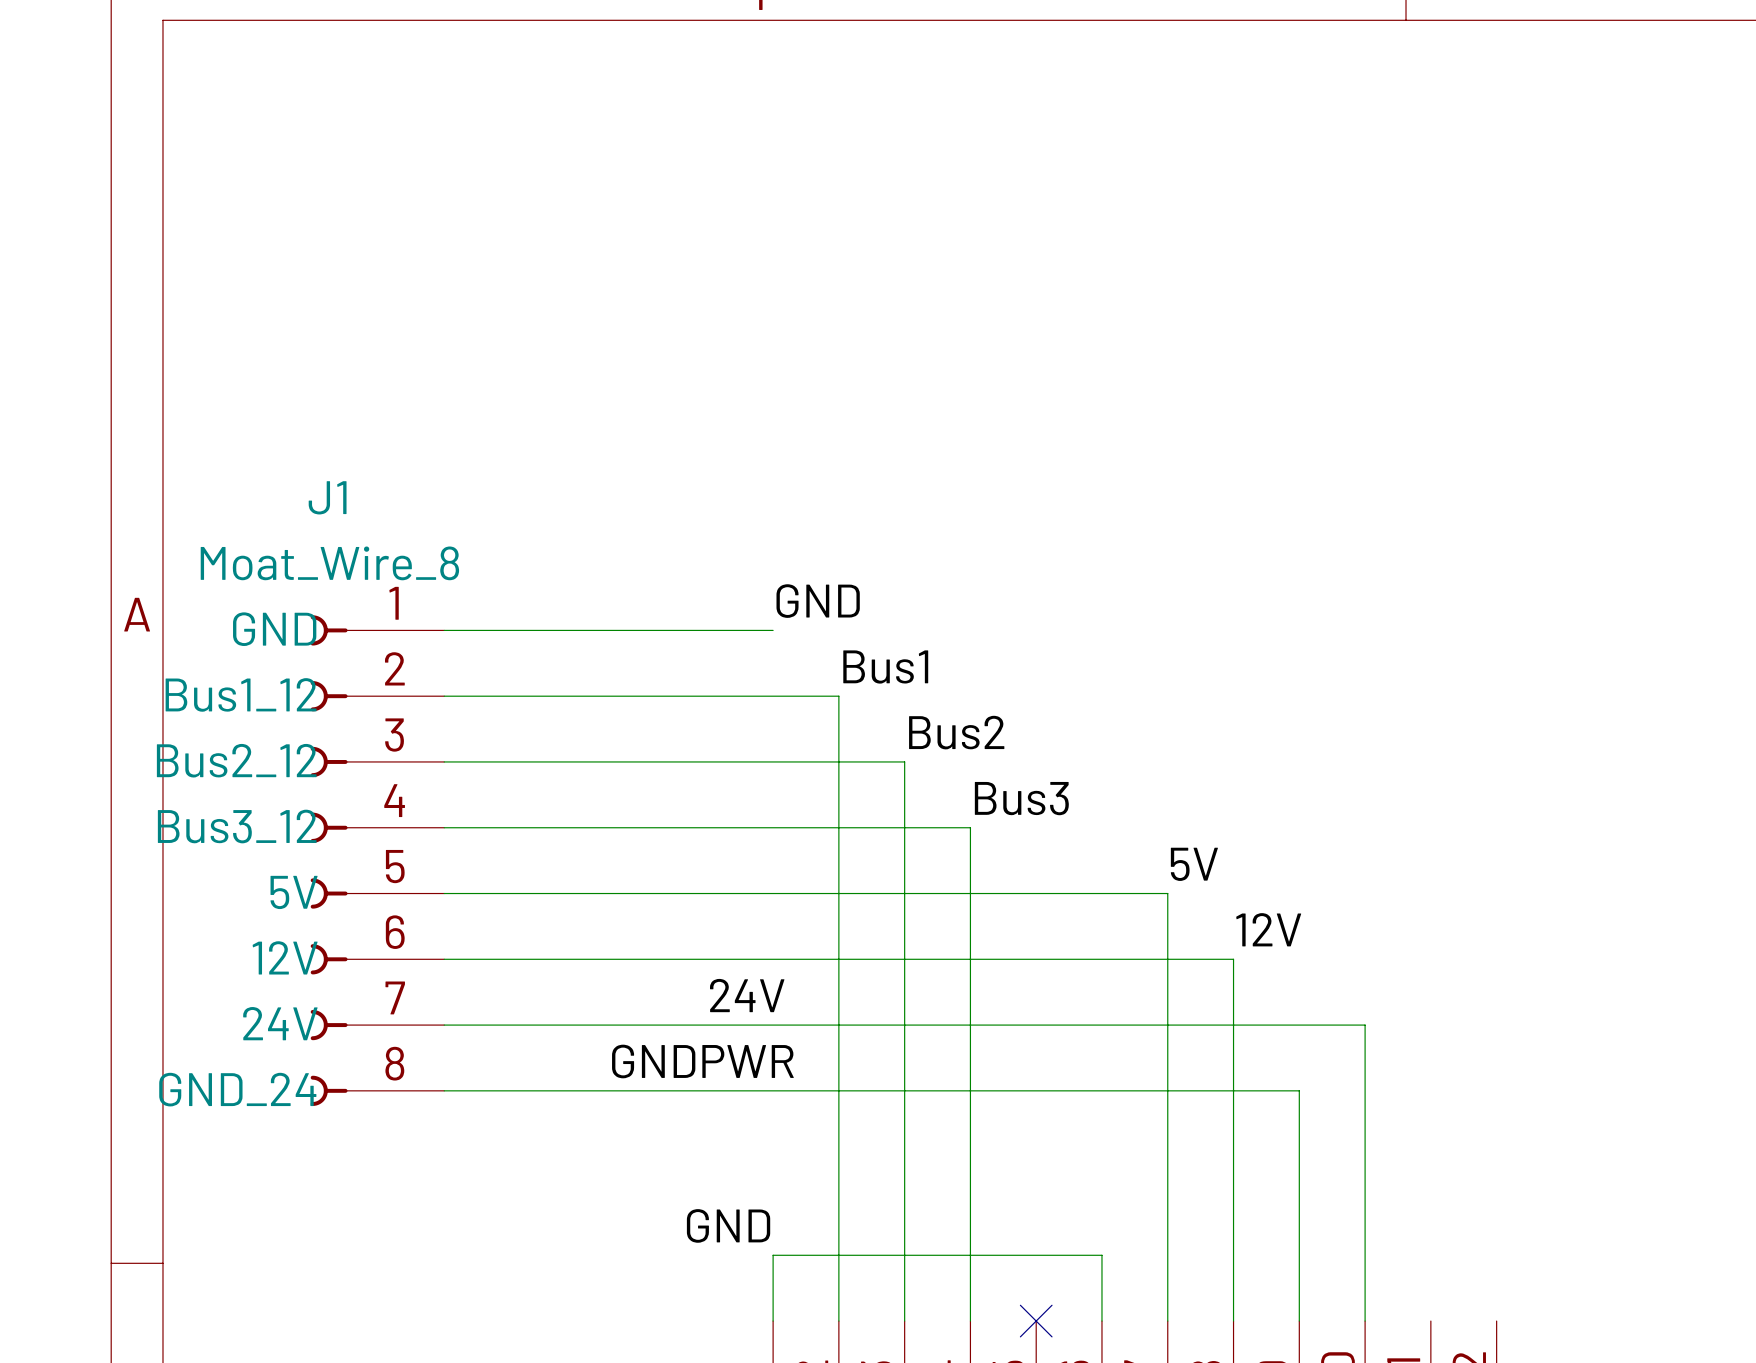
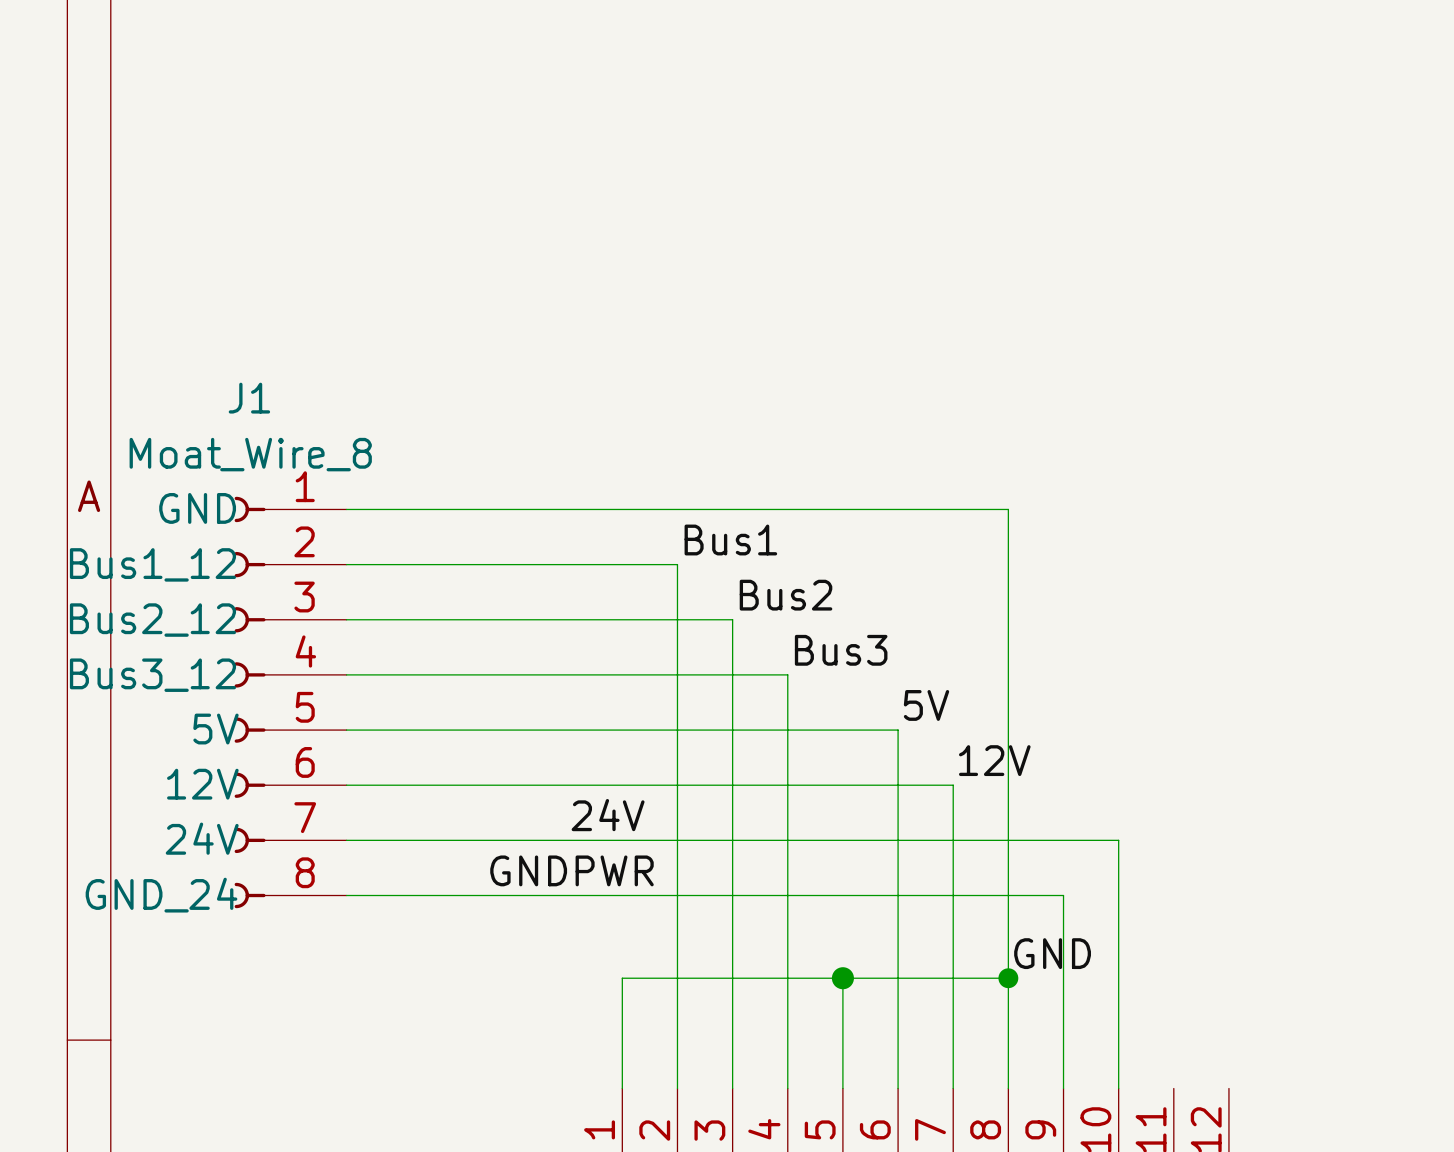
label: GND (818, 601) -> none
wire: none -> (622, 509) (1008, 509) (1008, 785)
label position: 5V (1194, 864) -> 5V (926, 705)
wire: (1101, 893) (1167, 893) (1167, 959) (1233, 959) -> (898, 730) (898, 1033)
label position: 12V (1268, 929) -> 12V (994, 760)
label: none -> GND (1052, 953)
wire: none -> (842, 978) (842, 1088)
junction: none -> (842, 978)
junction: none -> (1008, 978)
label: GND (728, 1225) -> none
wire: (773, 1255) (1101, 1255) -> (622, 1033) (622, 978) (1008, 978)
no-connect mark: (1036, 1321) -> none

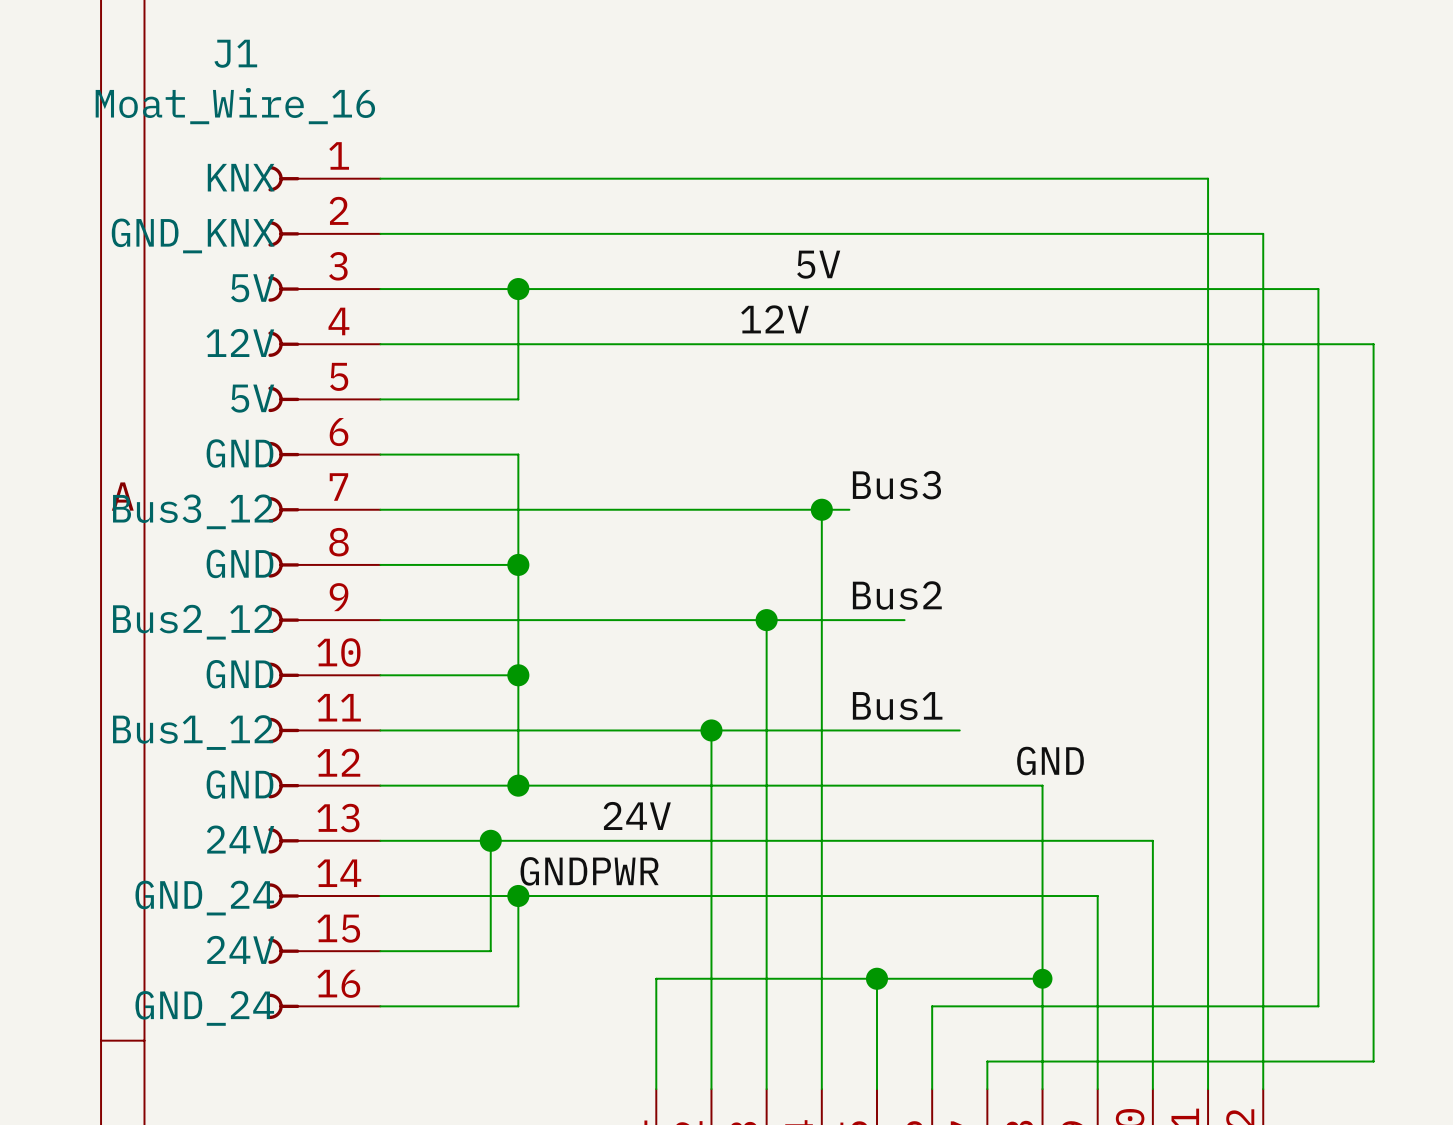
wire: none -> (380, 178) (1208, 178) (1208, 1089)
wire: none -> (380, 233) (1263, 233) (1263, 1089)
wire: none -> (380, 289) (1318, 289) (1318, 1006) (932, 1006)
wire: none -> (518, 289) (518, 399) (380, 399)
junction: none -> (518, 289)
wire: none -> (380, 344) (1373, 344) (1373, 1061) (987, 1061)
J1 name position: J1 (249, 398) -> J1 (235, 53)
J1 value: Moat_Wire_8 (250, 454) -> Moat_Wire_16 (235, 106)
wire: none -> (380, 454) (518, 454) (518, 785)
J1 symbol: [234, 496, 347, 909] -> [268, 166, 381, 1020]
junction: none -> (821, 509)
wire: (815, 509) (1008, 509) (1008, 785) -> none
label position: Bus1 (730, 540) -> Bus1 (897, 706)
wire: (484, 564) (677, 564) (677, 730) -> none
junction: none -> (518, 564)
label position: Bus2 (786, 595) -> Bus2 (897, 595)
wire: none -> (766, 620) (904, 620)
junction: none -> (766, 620)
label position: Bus3 (841, 650) -> Bus3 (896, 485)
wire: (484, 674) (787, 674) -> (821, 509) (821, 675)
junction: none -> (518, 675)
label position: 5V (926, 705) -> 5V (818, 264)
junction: none -> (711, 730)
wire: (898, 730) (898, 1005) -> (932, 730) (959, 730)
label position: 12V (994, 760) -> 12V (774, 319)
junction: none -> (518, 785)
wire: (953, 785) (953, 1060) -> (987, 785) (1042, 785)
wire: none -> (490, 840) (490, 951) (380, 951)
junction: none -> (490, 840)
wire: none -> (518, 896) (518, 1006) (380, 1006)
junction: none -> (518, 896)
label position: GND (1052, 953) -> GND (1050, 761)

